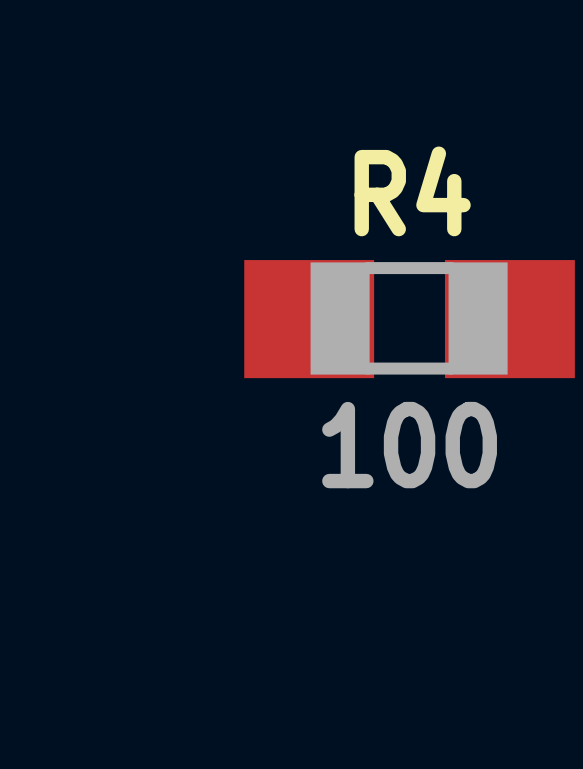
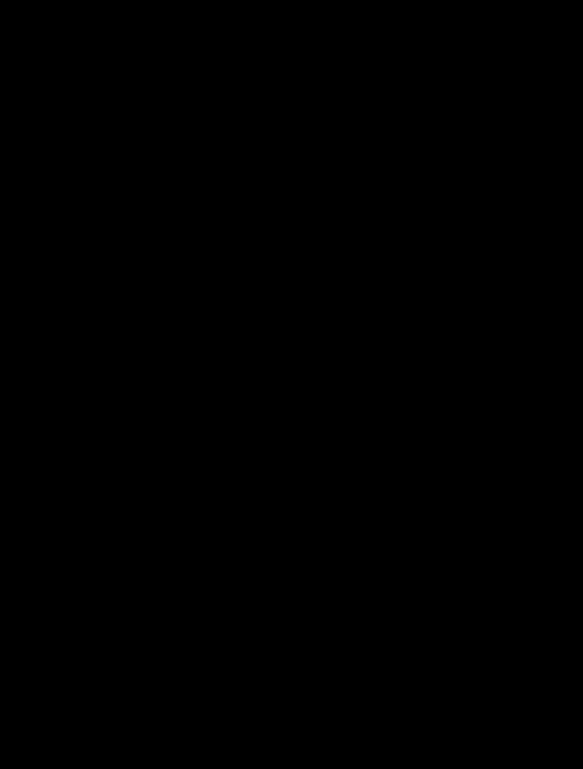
R4: 100 (409, 319) -> none

